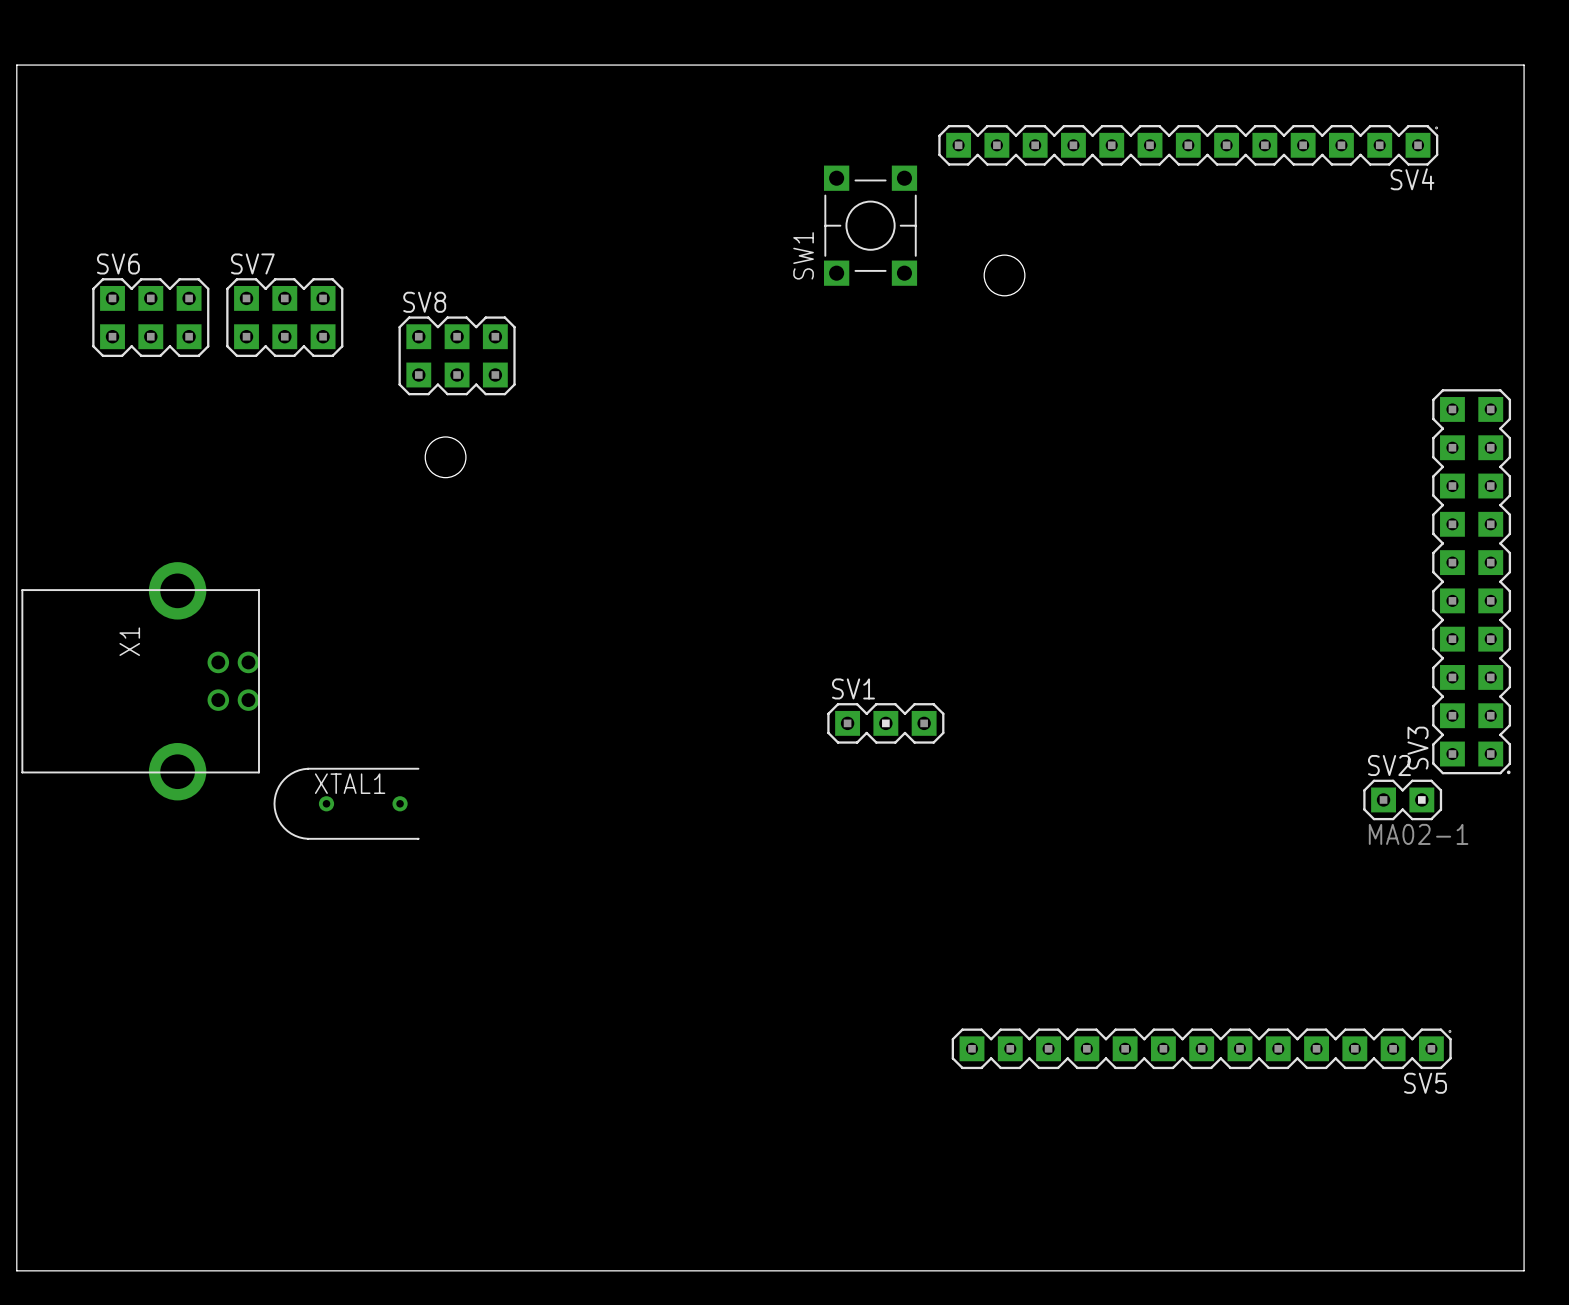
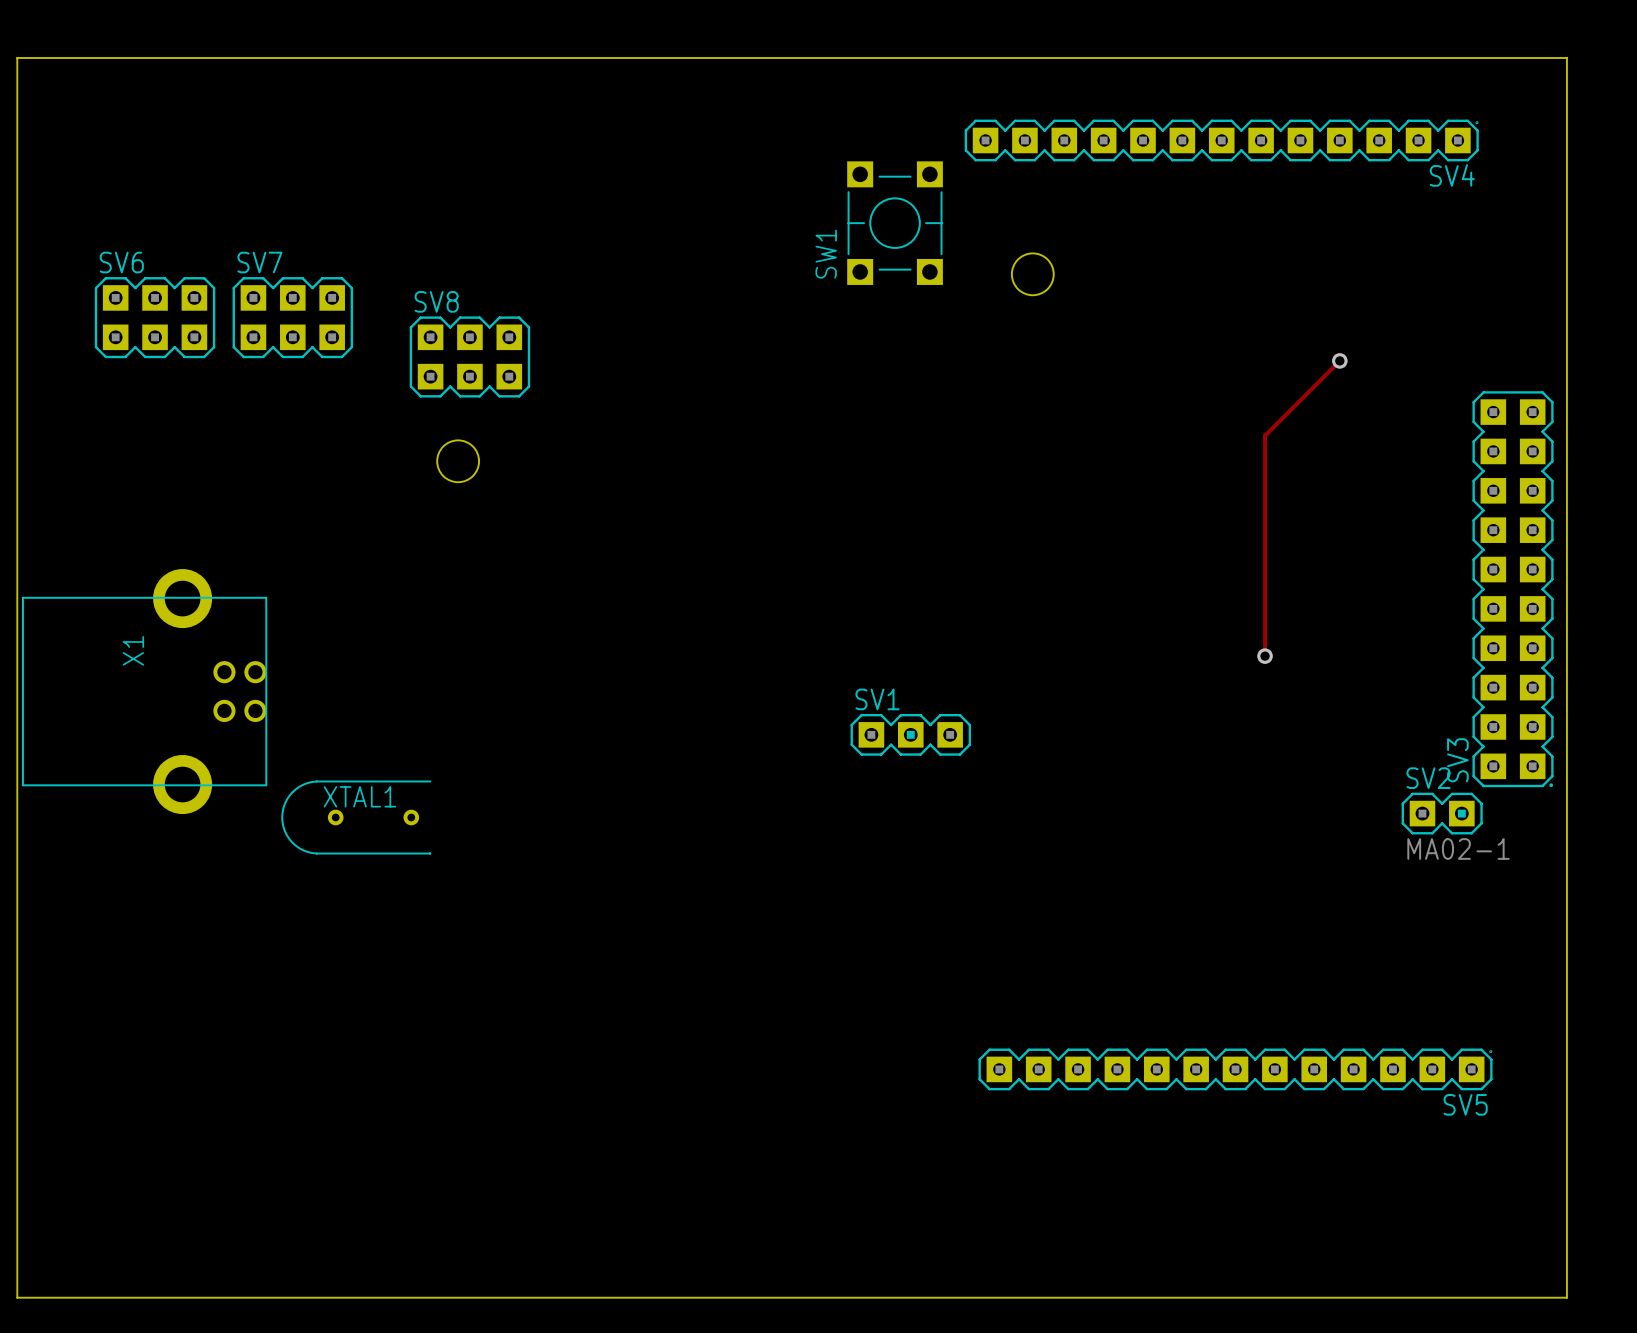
track: none -> (1339, 360) (1265, 435) (1265, 656)
via: none -> (1339, 360)
via: none -> (1265, 656)

